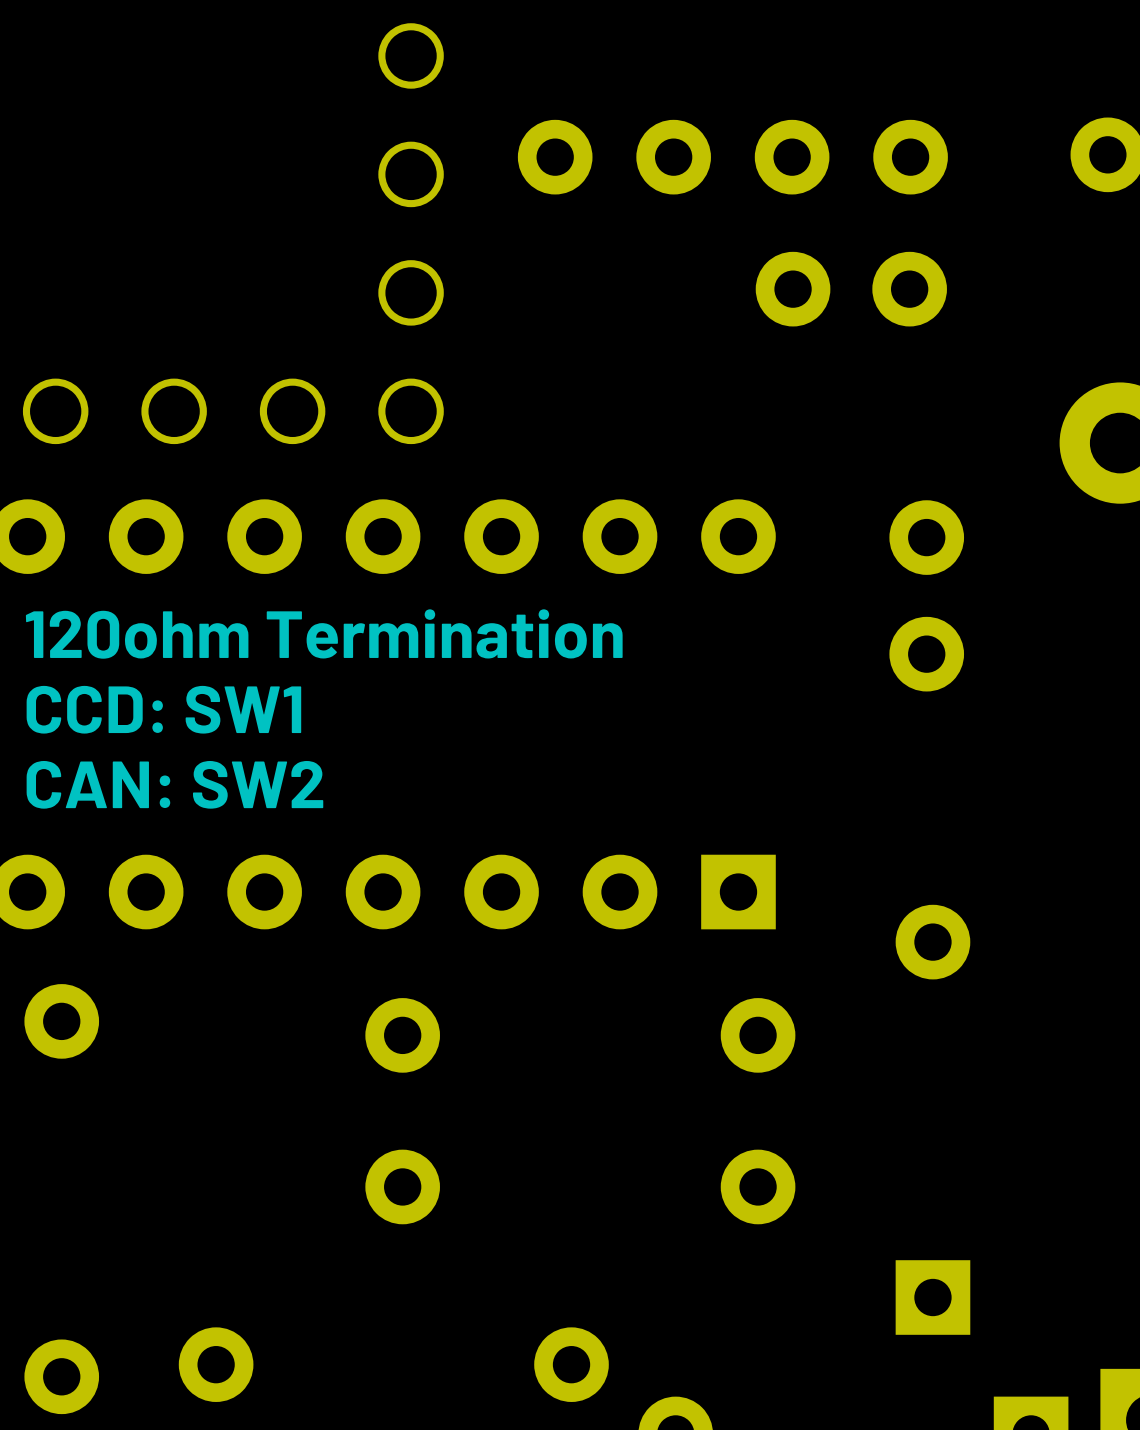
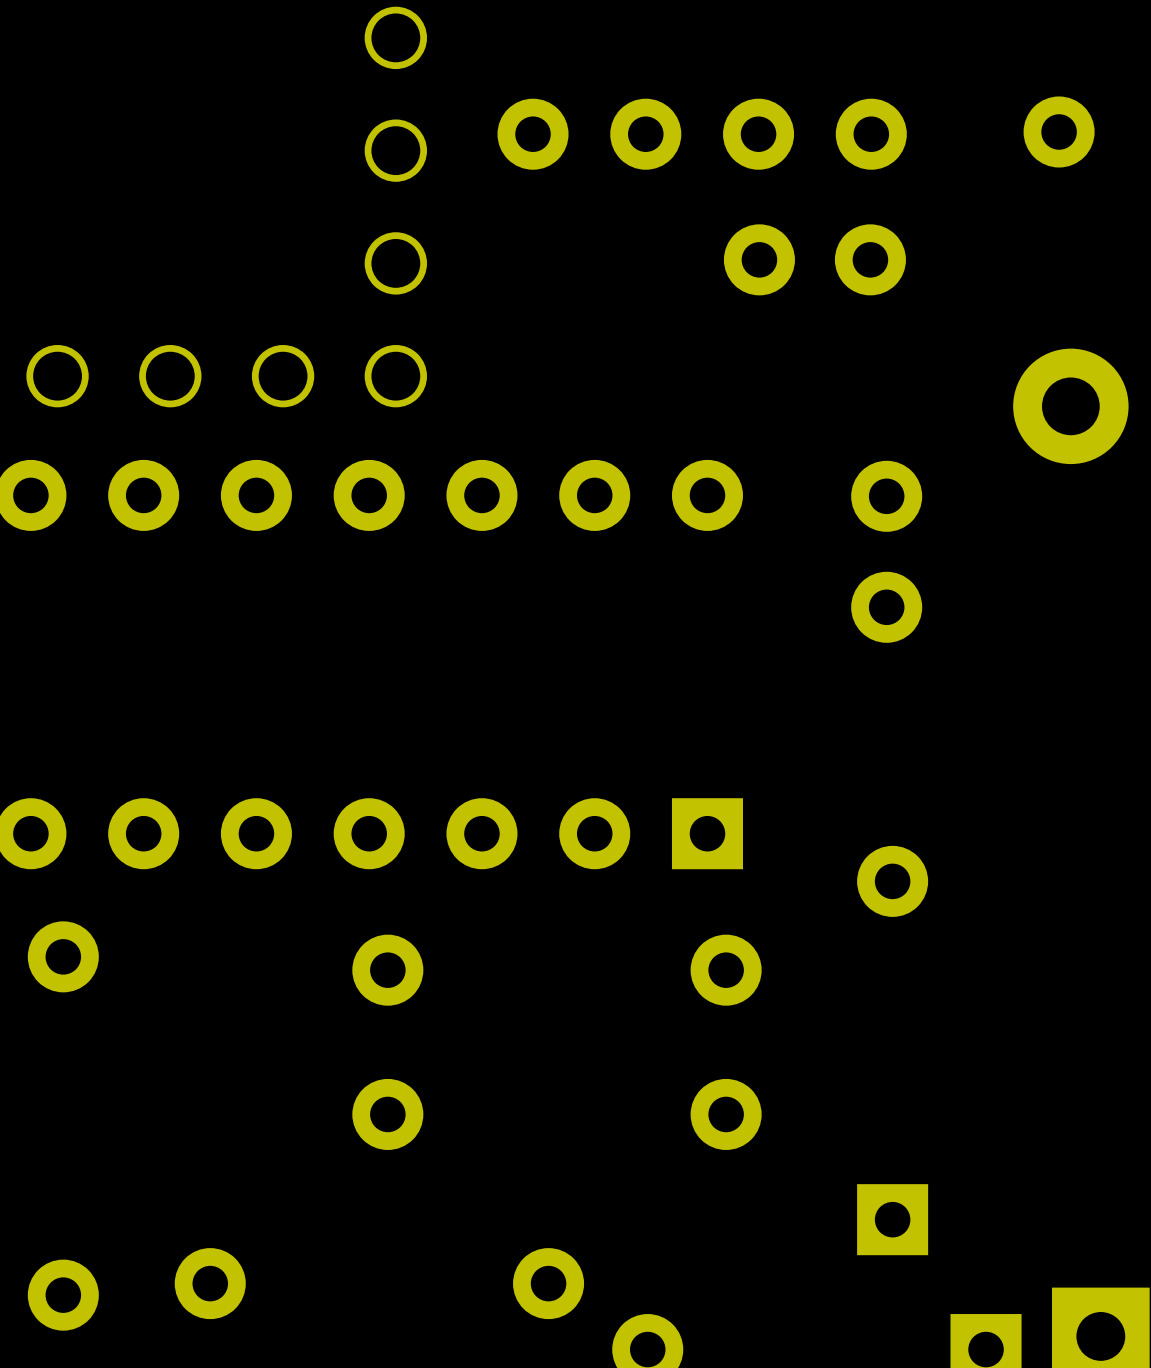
text: 120ohm Termination (324, 634) -> none
text: CCD: SW1 (163, 709) -> none
text: CAN: SW2 (174, 784) -> none

